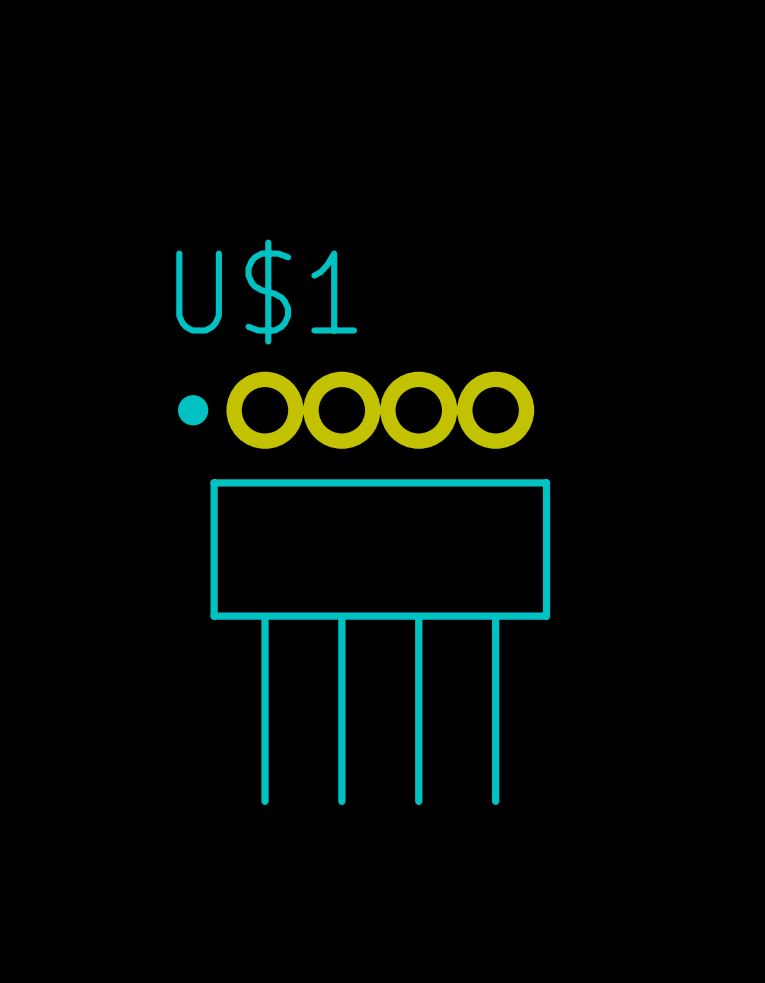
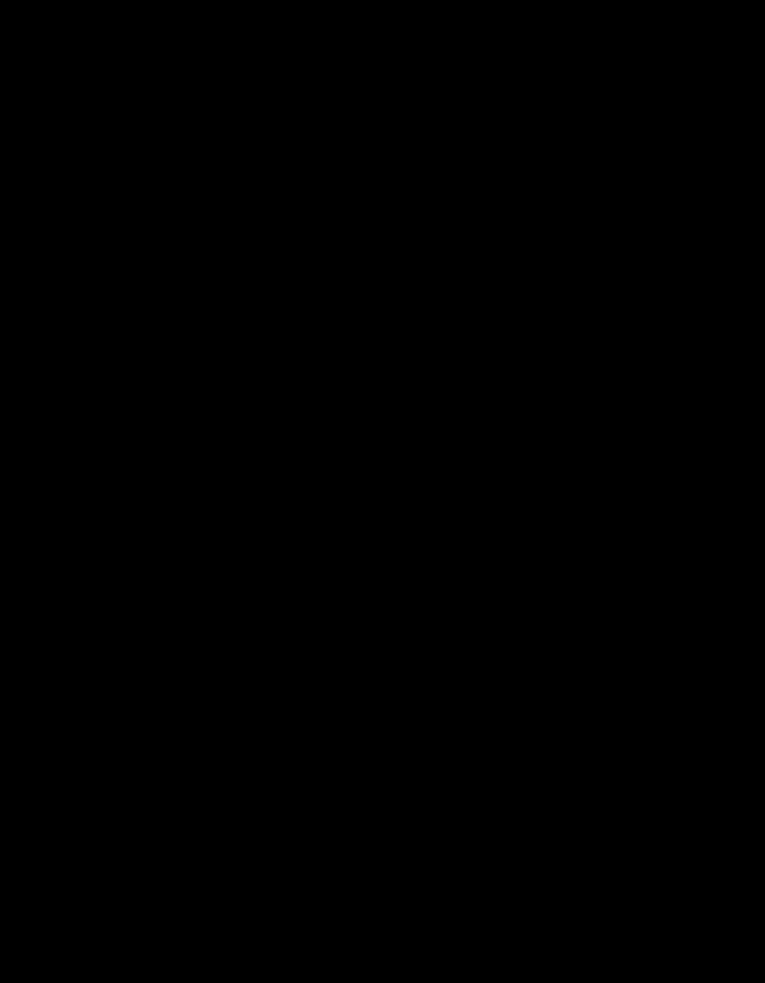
U$1: (364, 588) -> none

